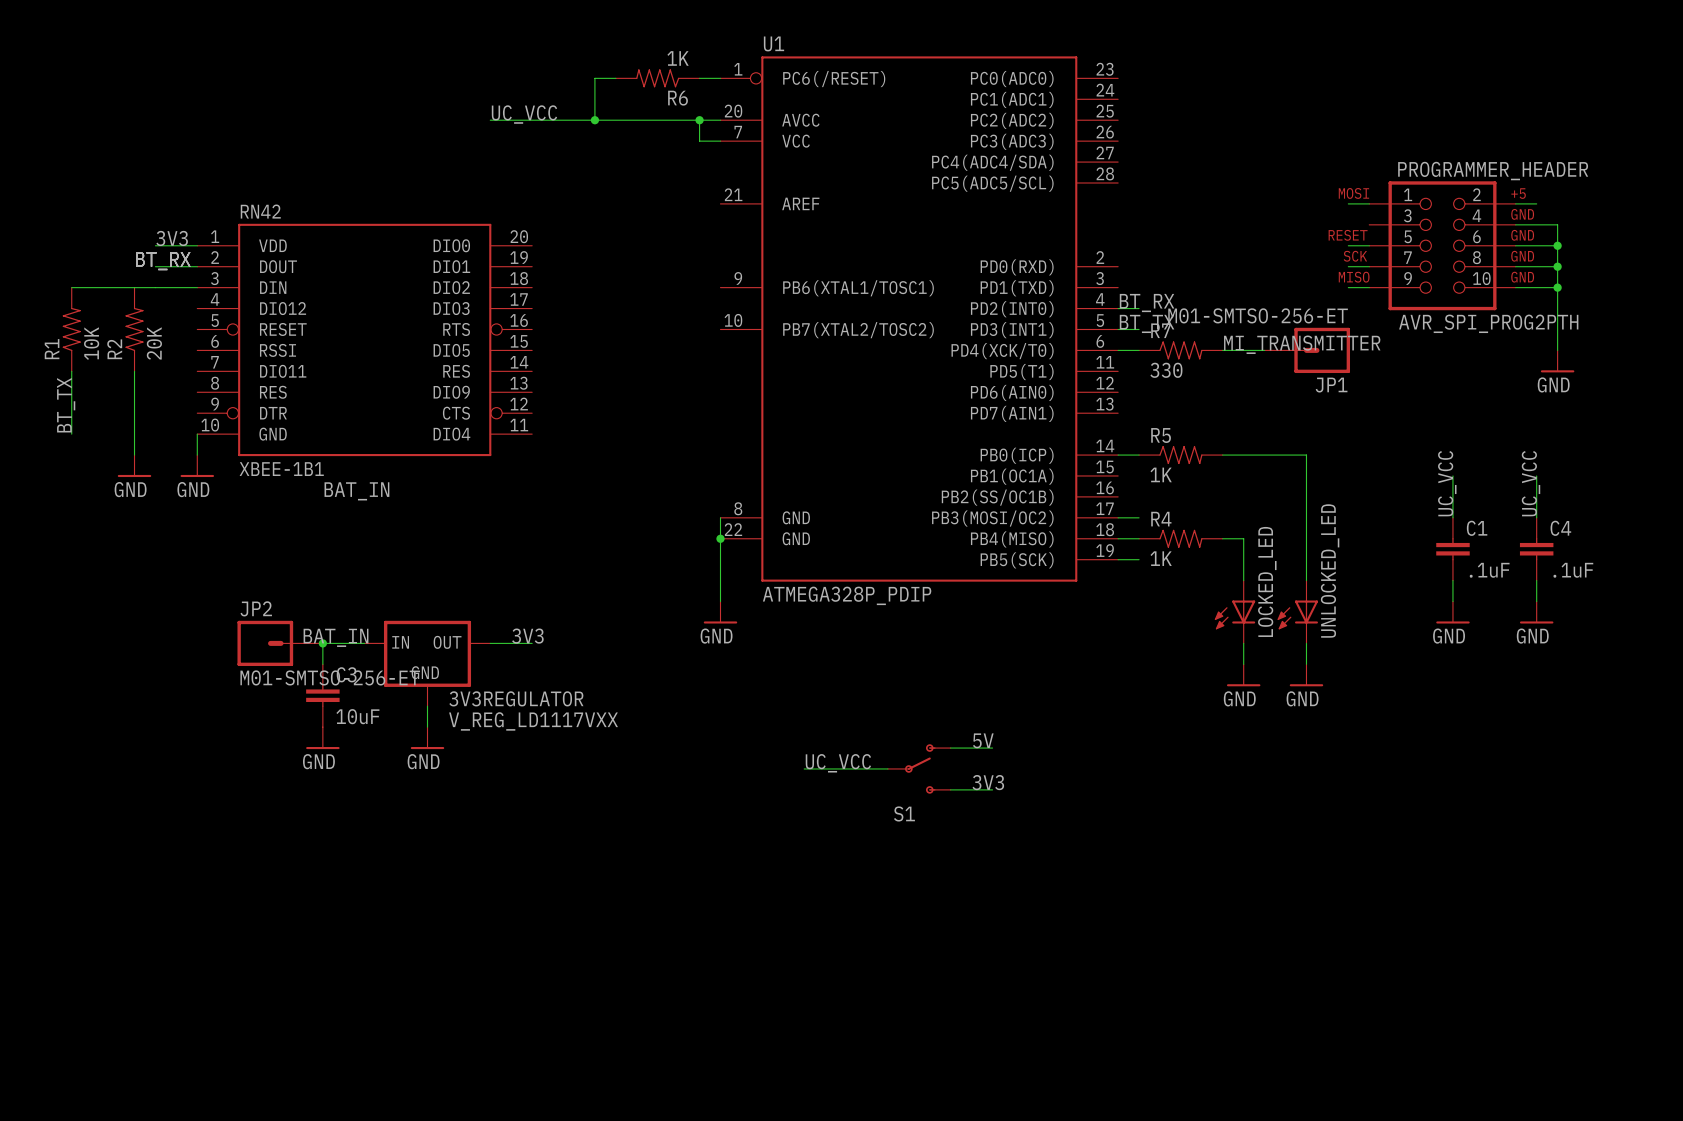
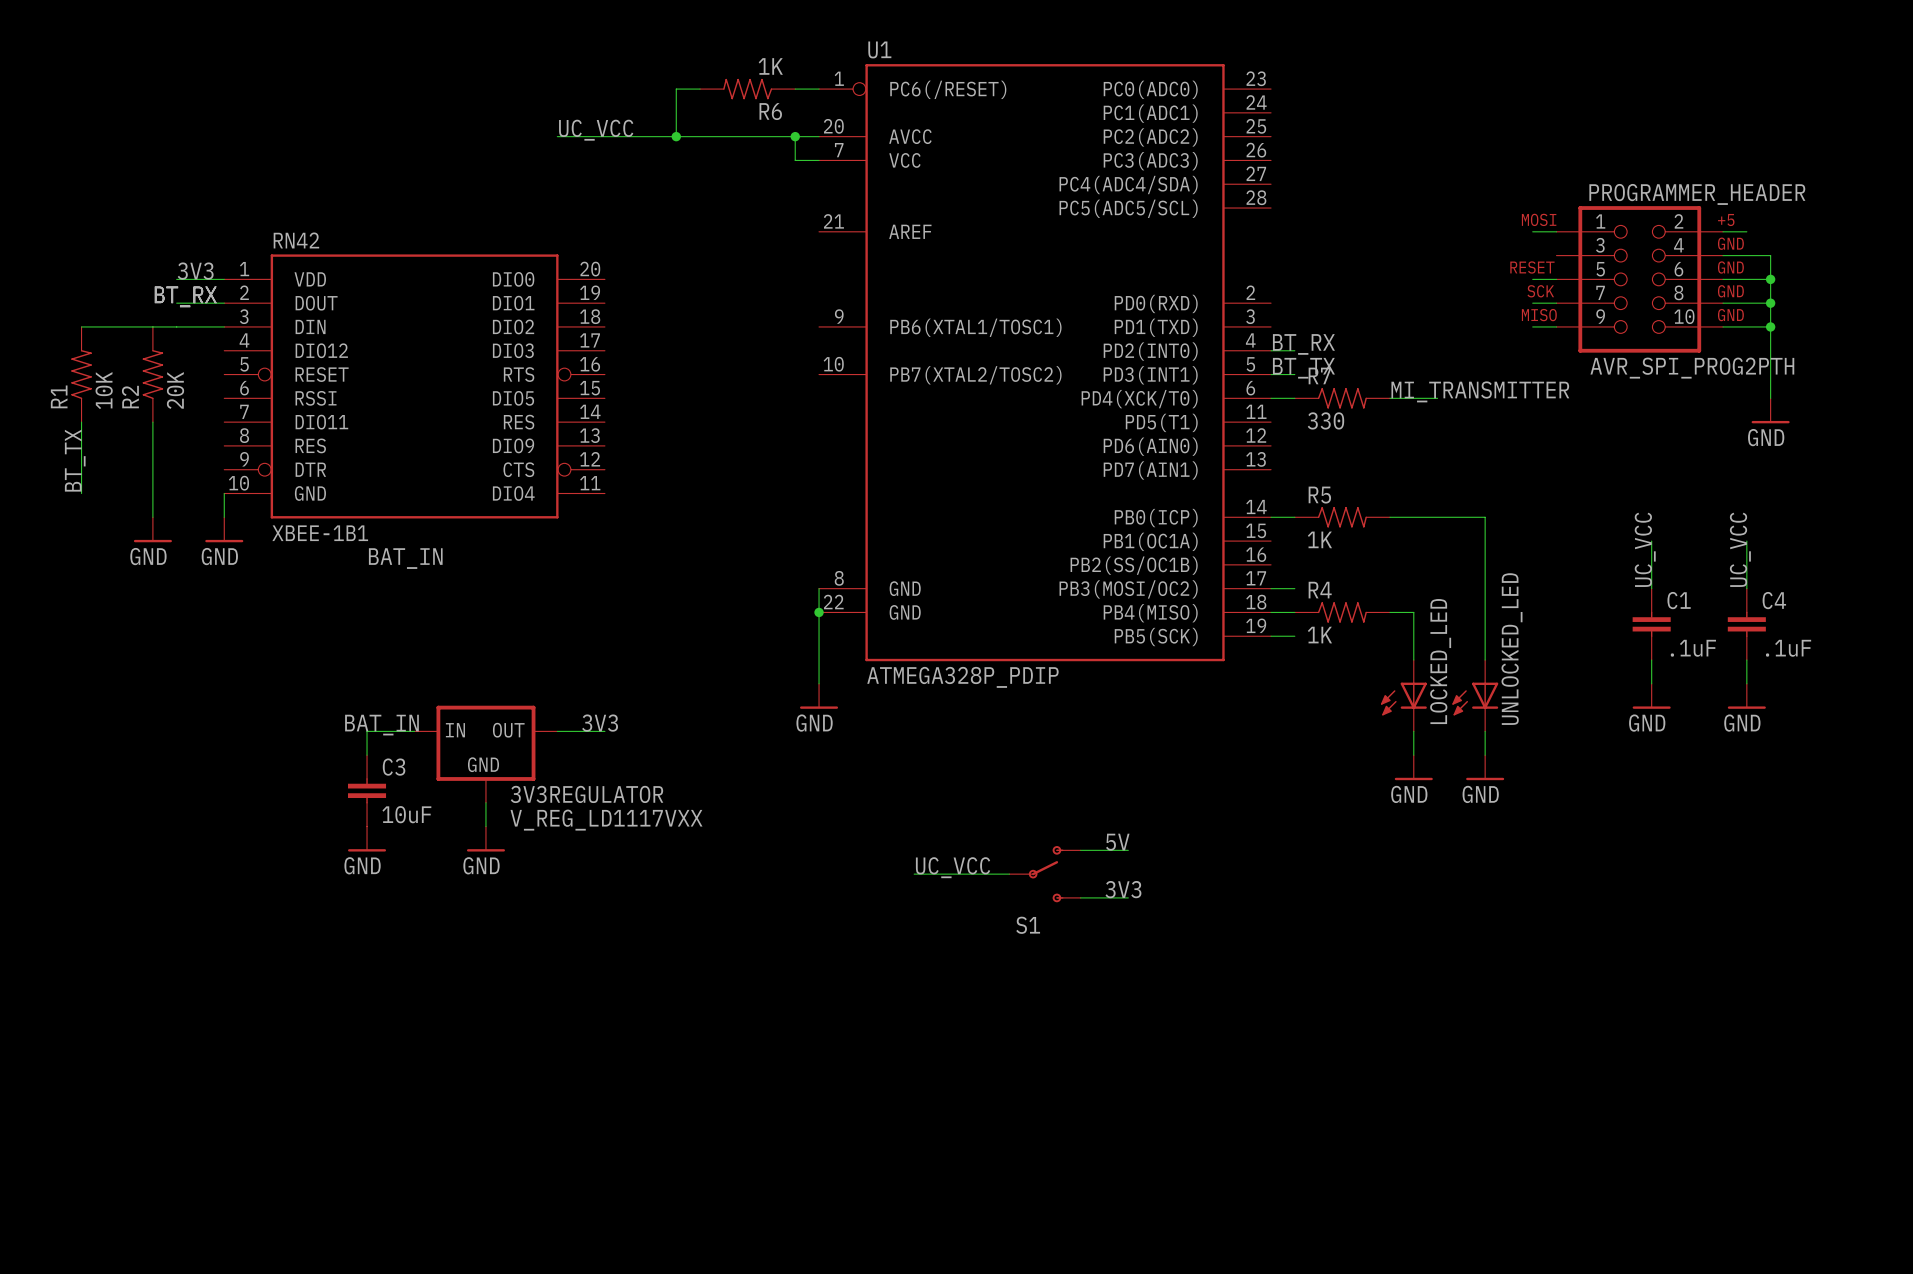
JP1: M01-SMTSO-256-ET (1307, 350) -> none
JP2: M01-SMTSO-256-ET (280, 643) -> none
junction: (322, 643) -> none

